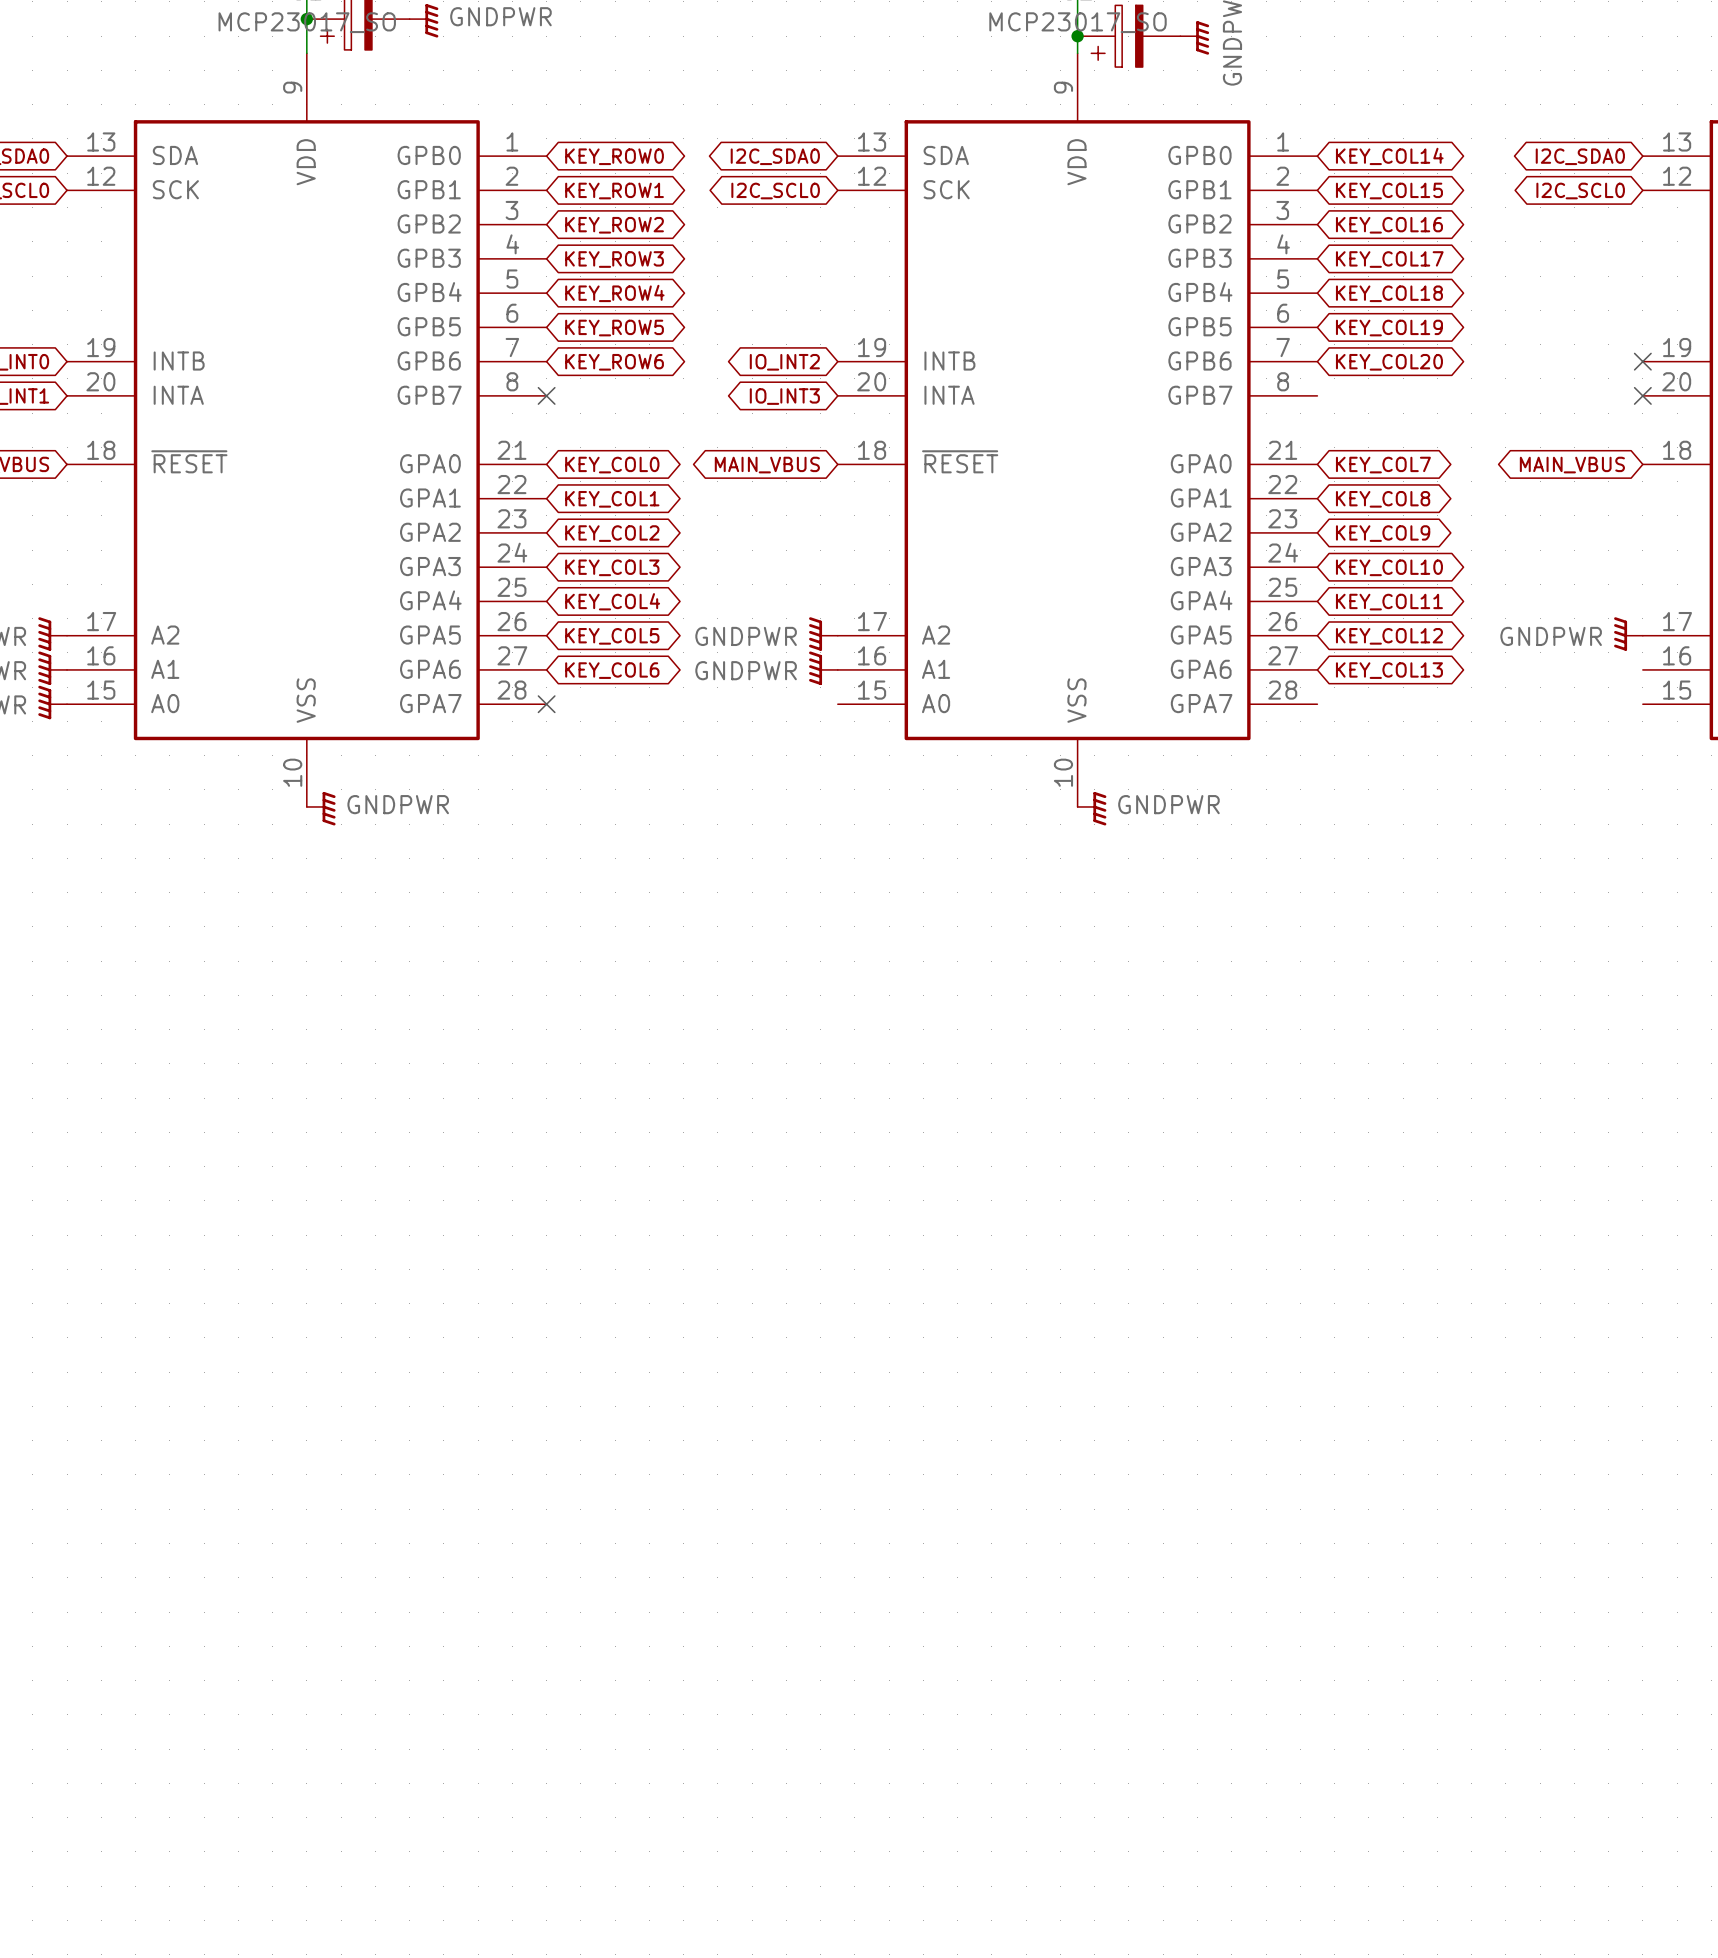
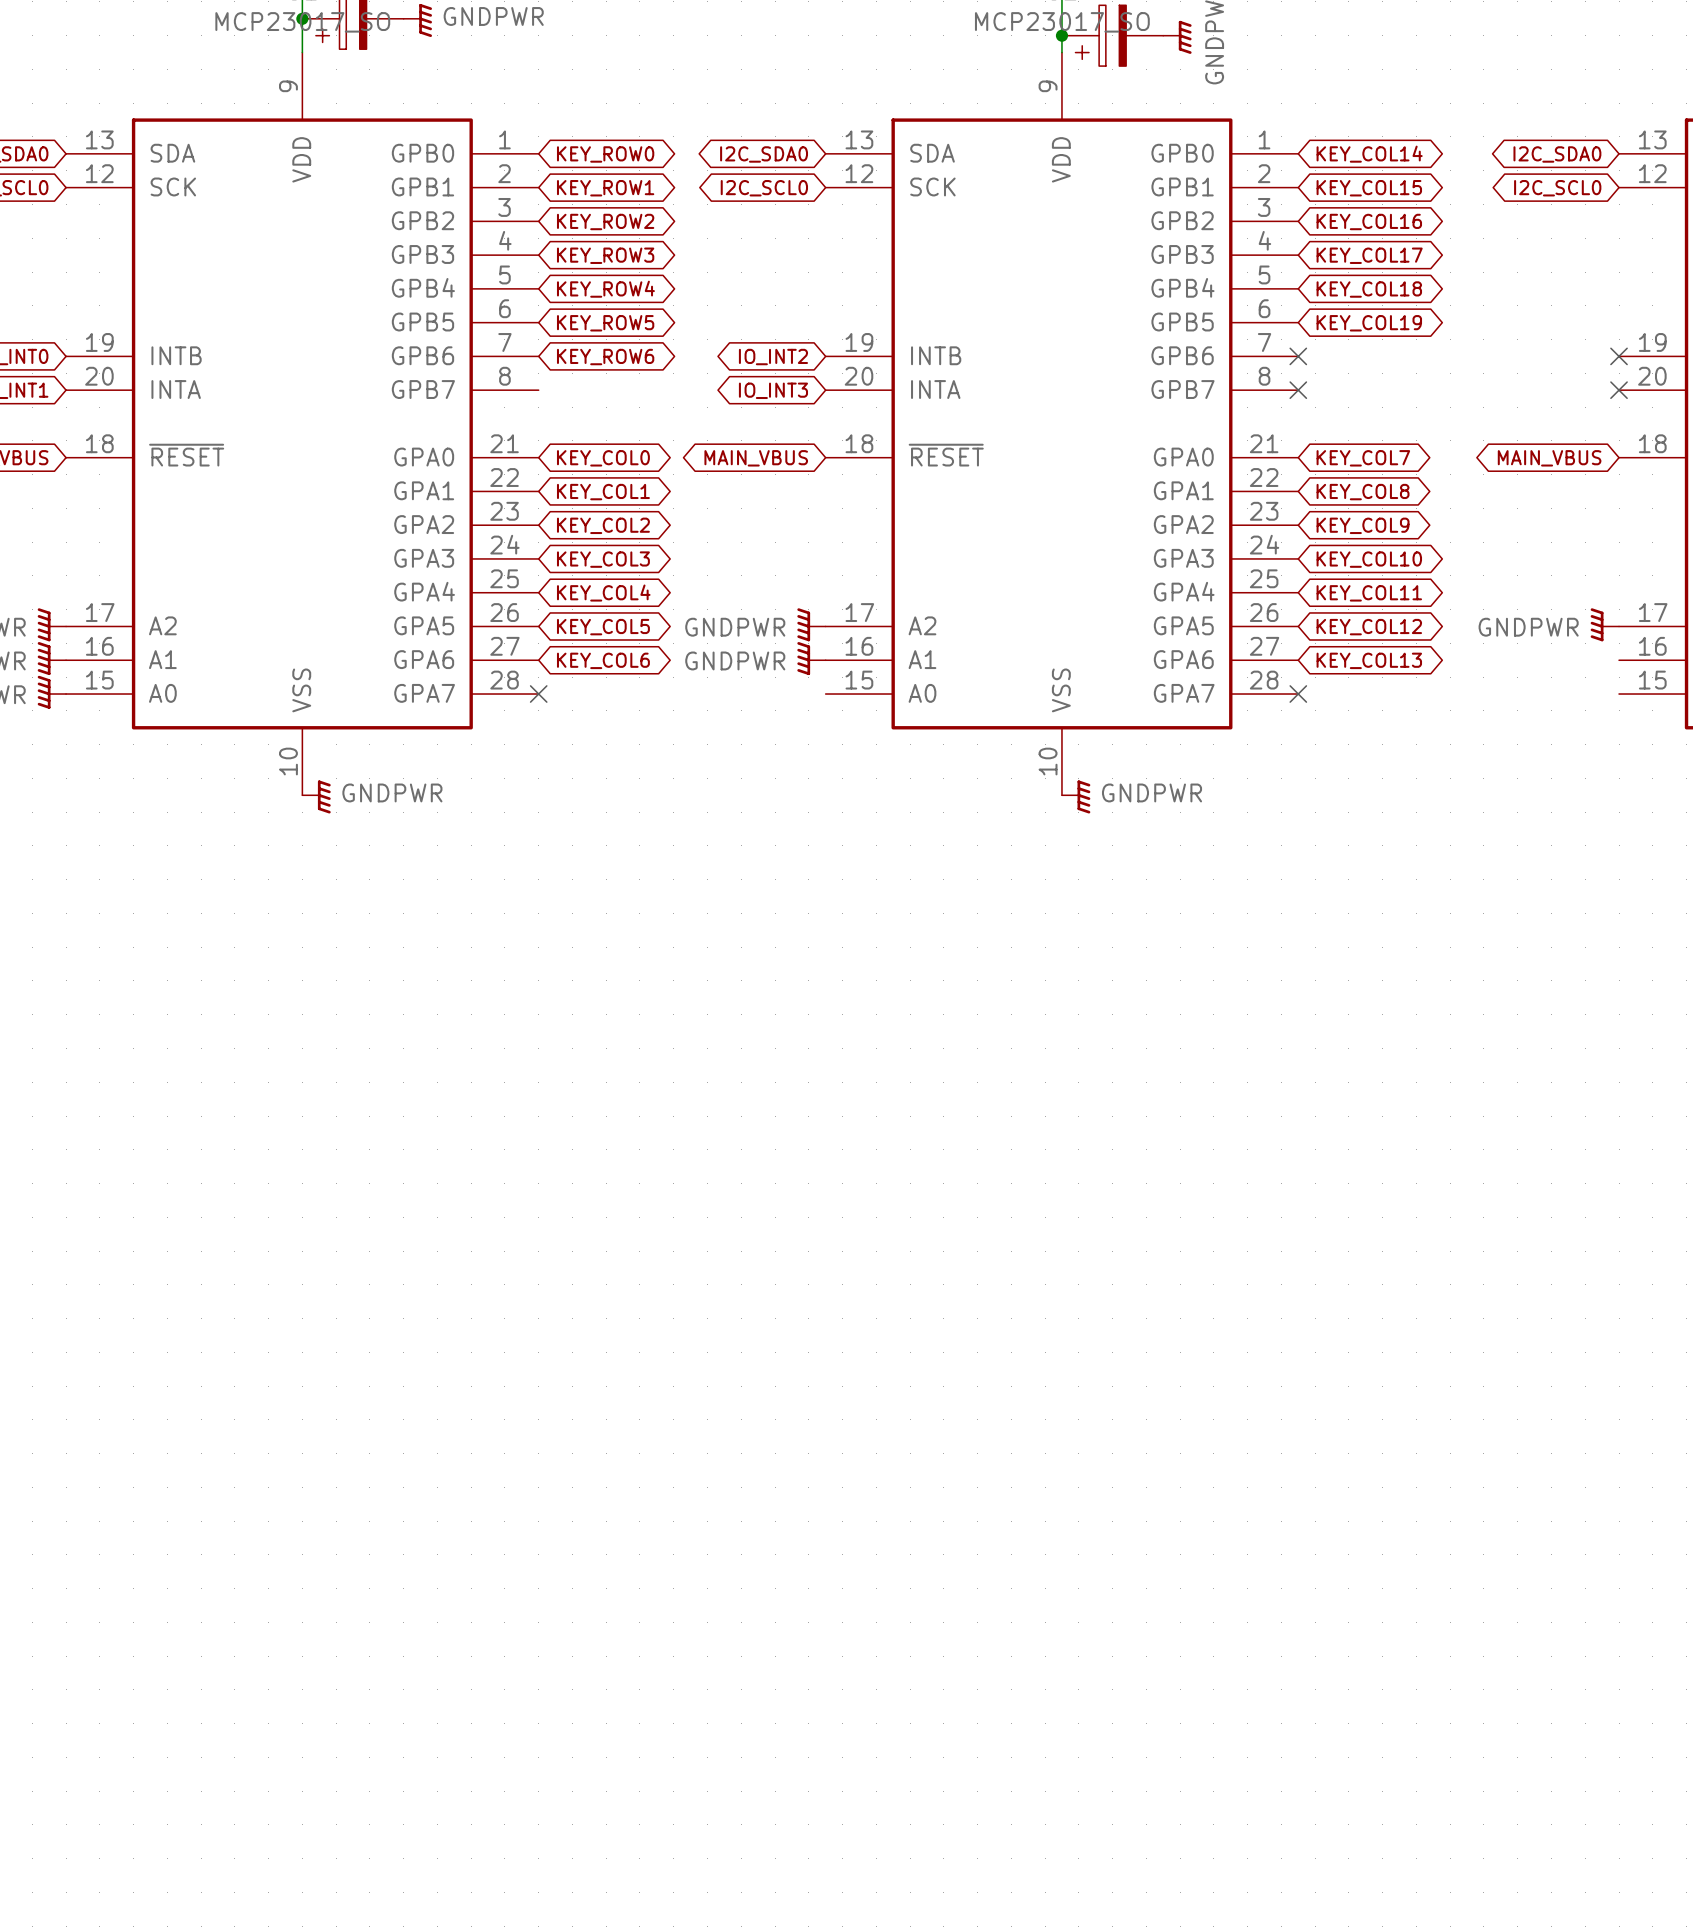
no-connect mark: none -> (1298, 356)
global label: KEY_COL20 (1389, 362) -> none
no-connect mark: (546, 395) -> none
no-connect mark: none -> (1298, 390)
no-connect mark: none -> (1298, 694)

